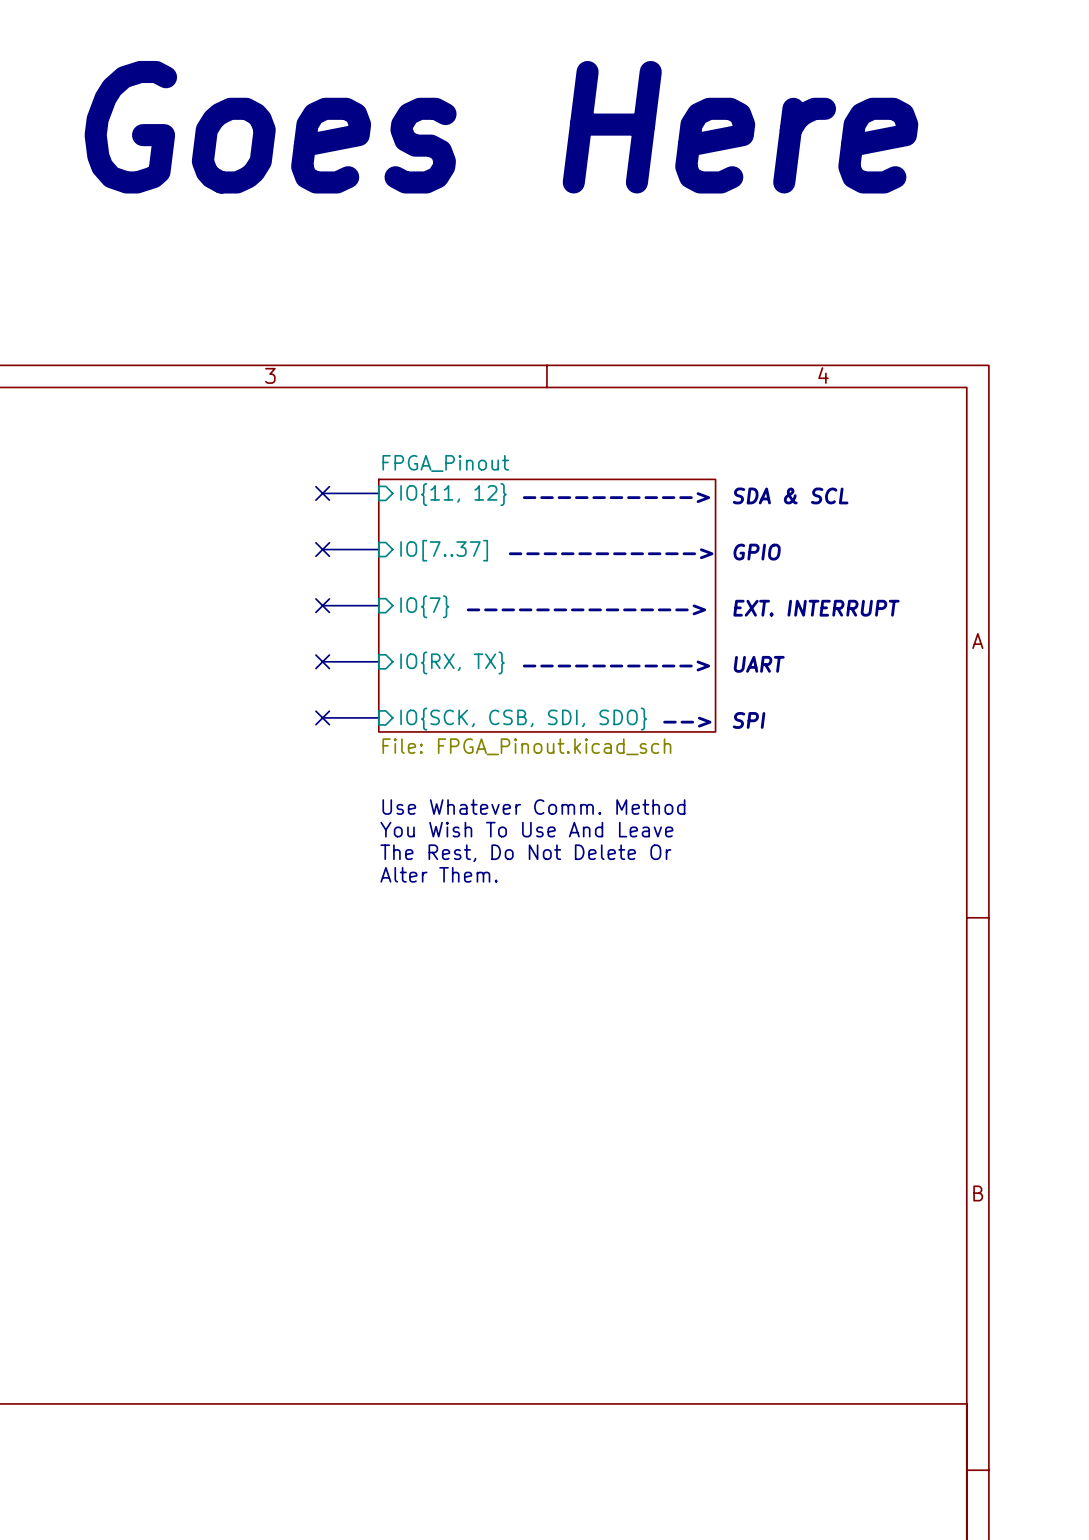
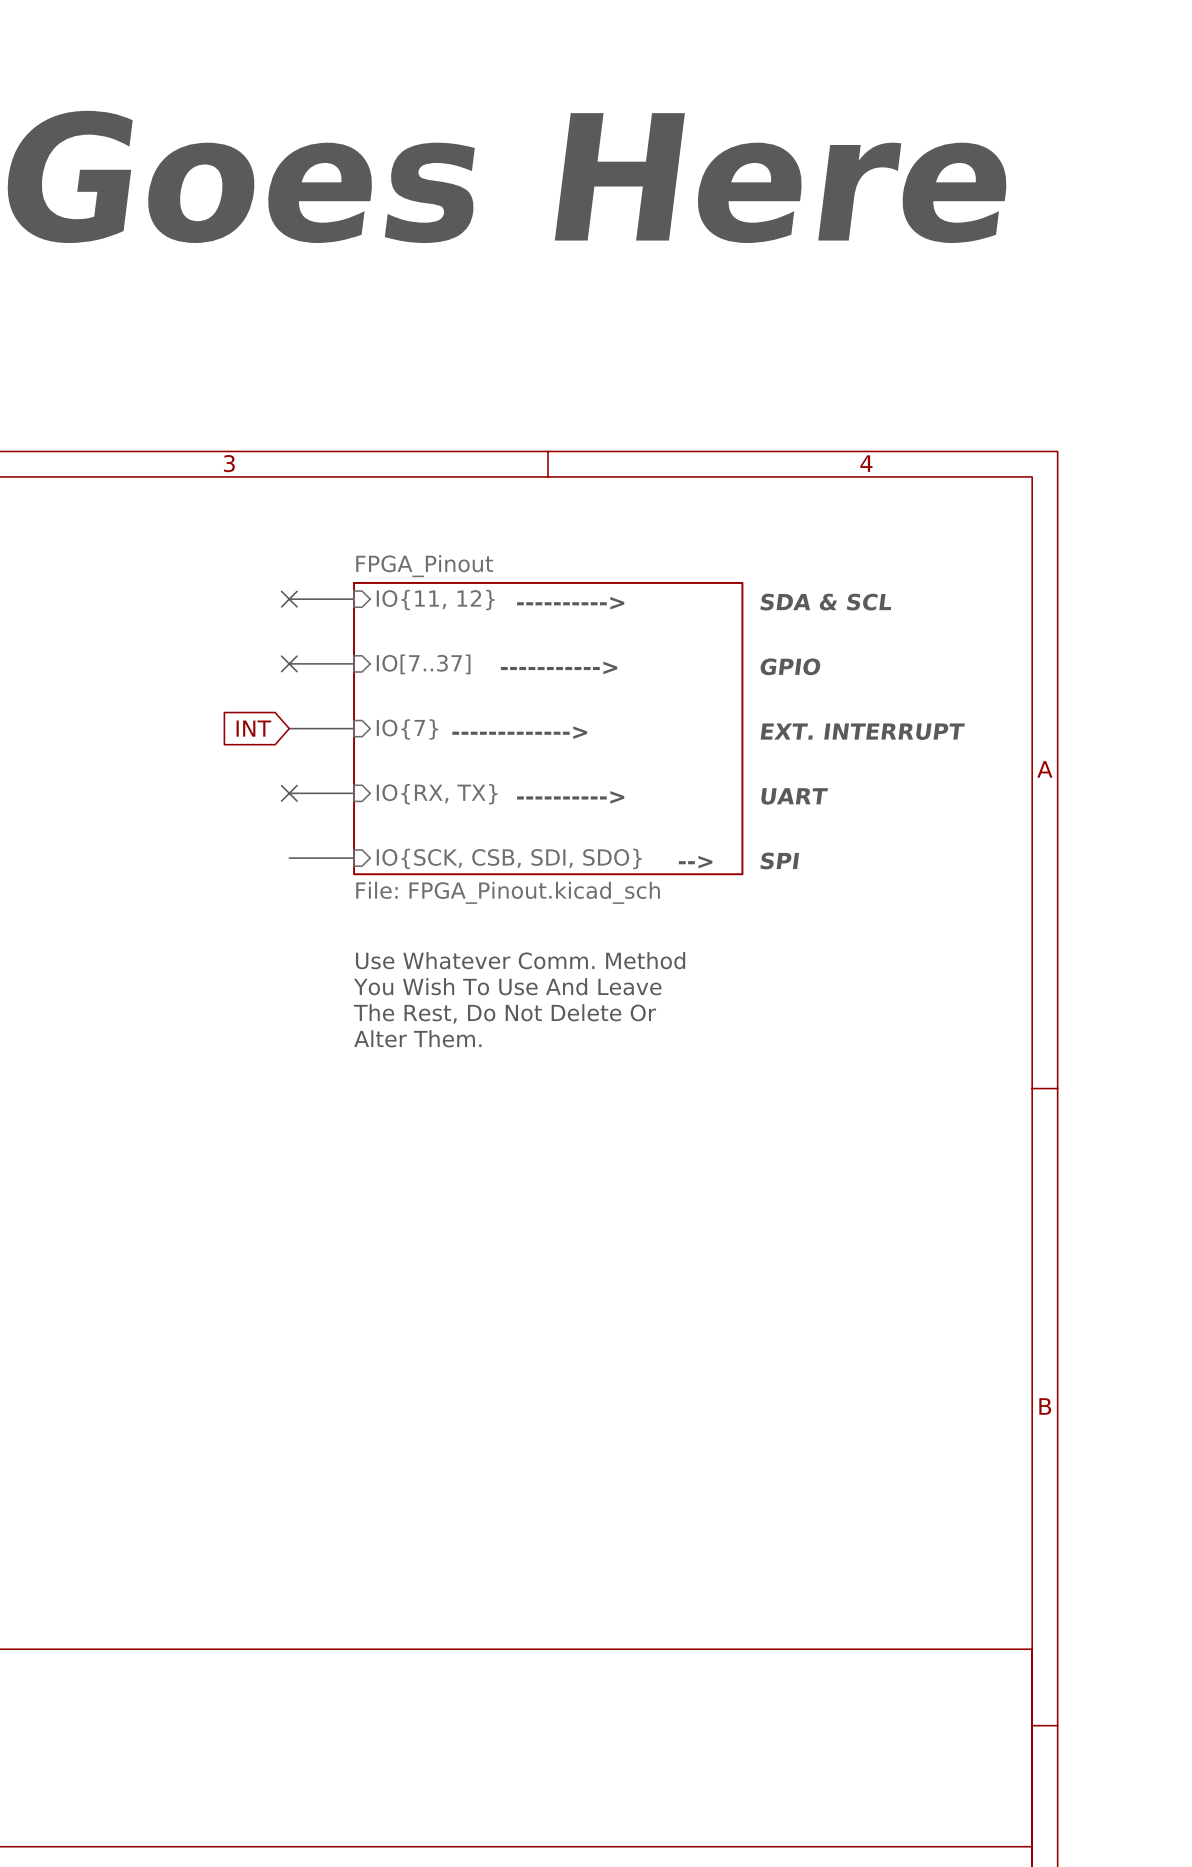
global label: none -> INT (253, 728)
no-connect mark: (322, 605) -> none
no-connect mark: (322, 717) -> none

